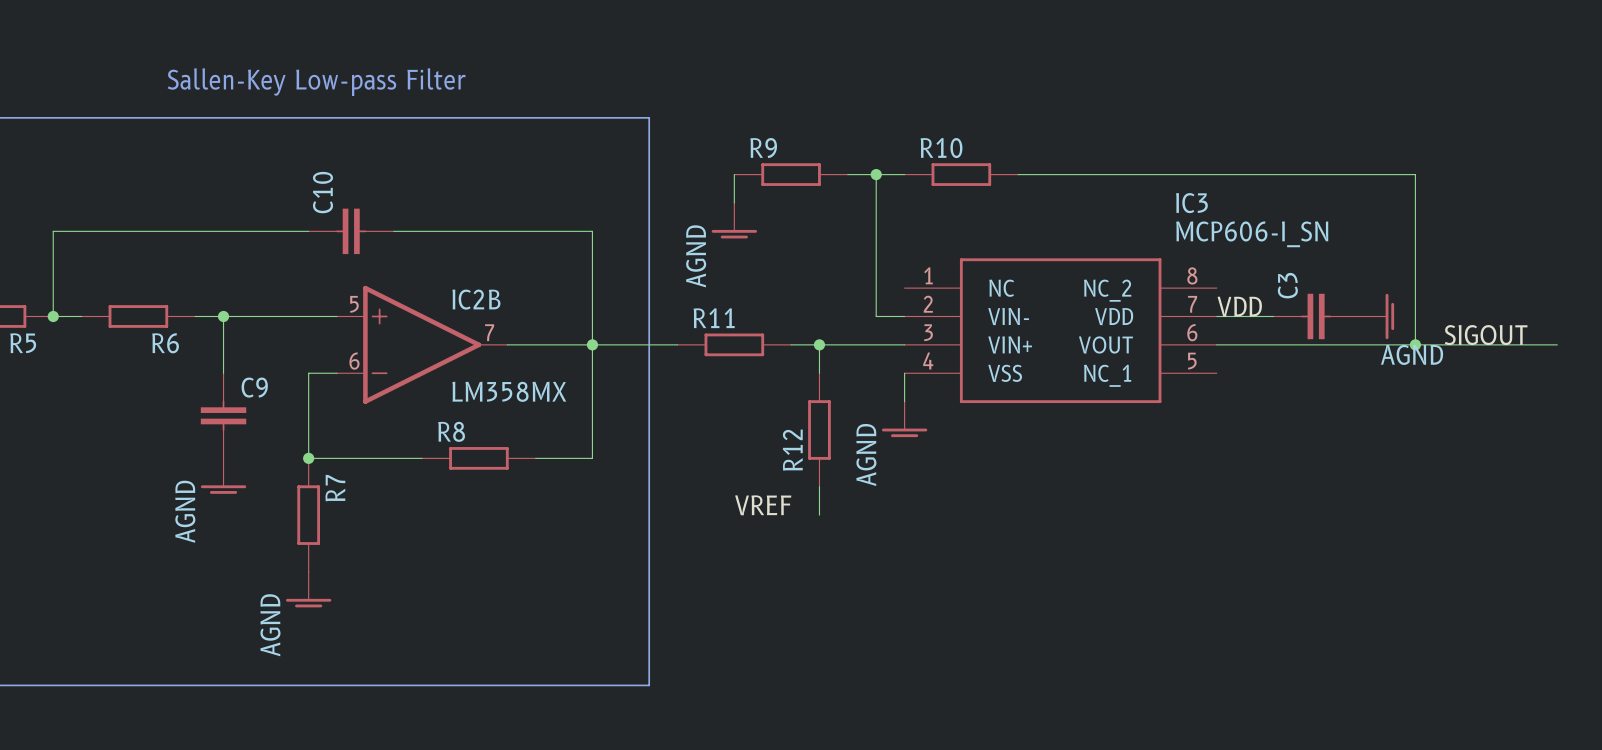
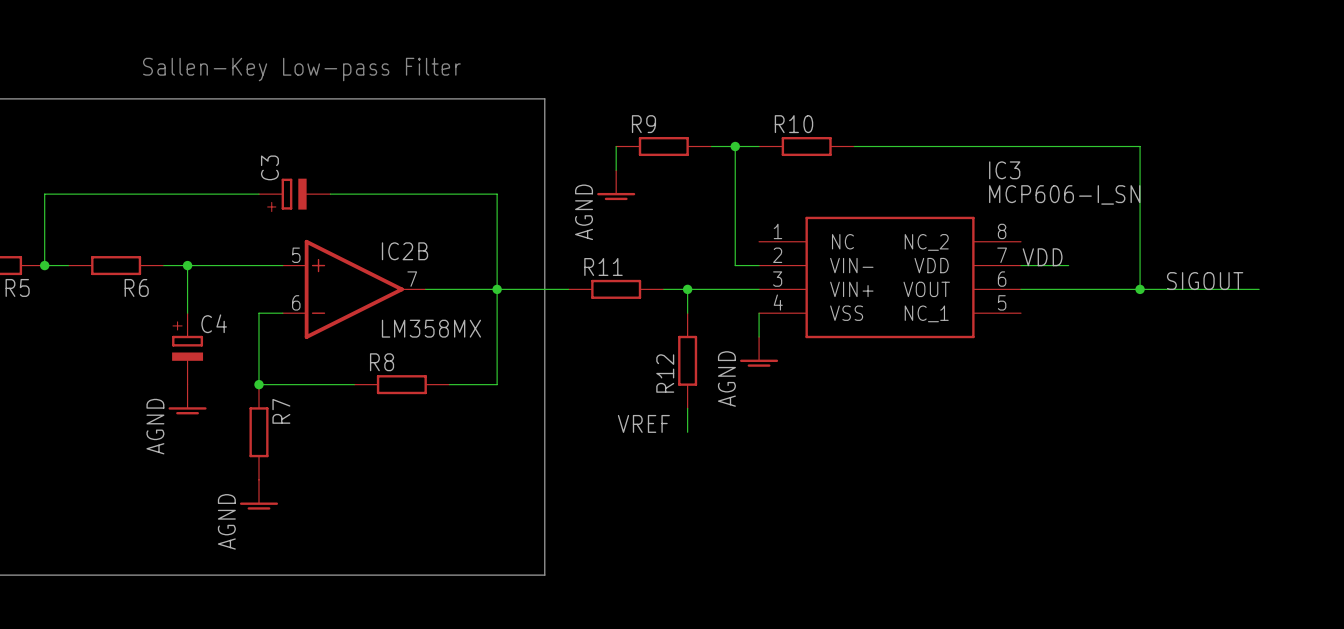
wire: (1358, 174) (1415, 174) (1415, 344) -> (1140, 146) (1140, 289)
C10: (351, 231) -> none
C3 symbol: [1273, 293, 1359, 340] -> [259, 178, 331, 210]
power symbol: AGND (1376, 316) -> none
label position: SIGOUT (1486, 335) -> SIGOUT (1205, 281)
junction position: (1415, 344) -> (1140, 289)
wire: (1500, 344) (1557, 344) -> none
C9: (223, 415) -> none
C4: none -> (187, 348)

